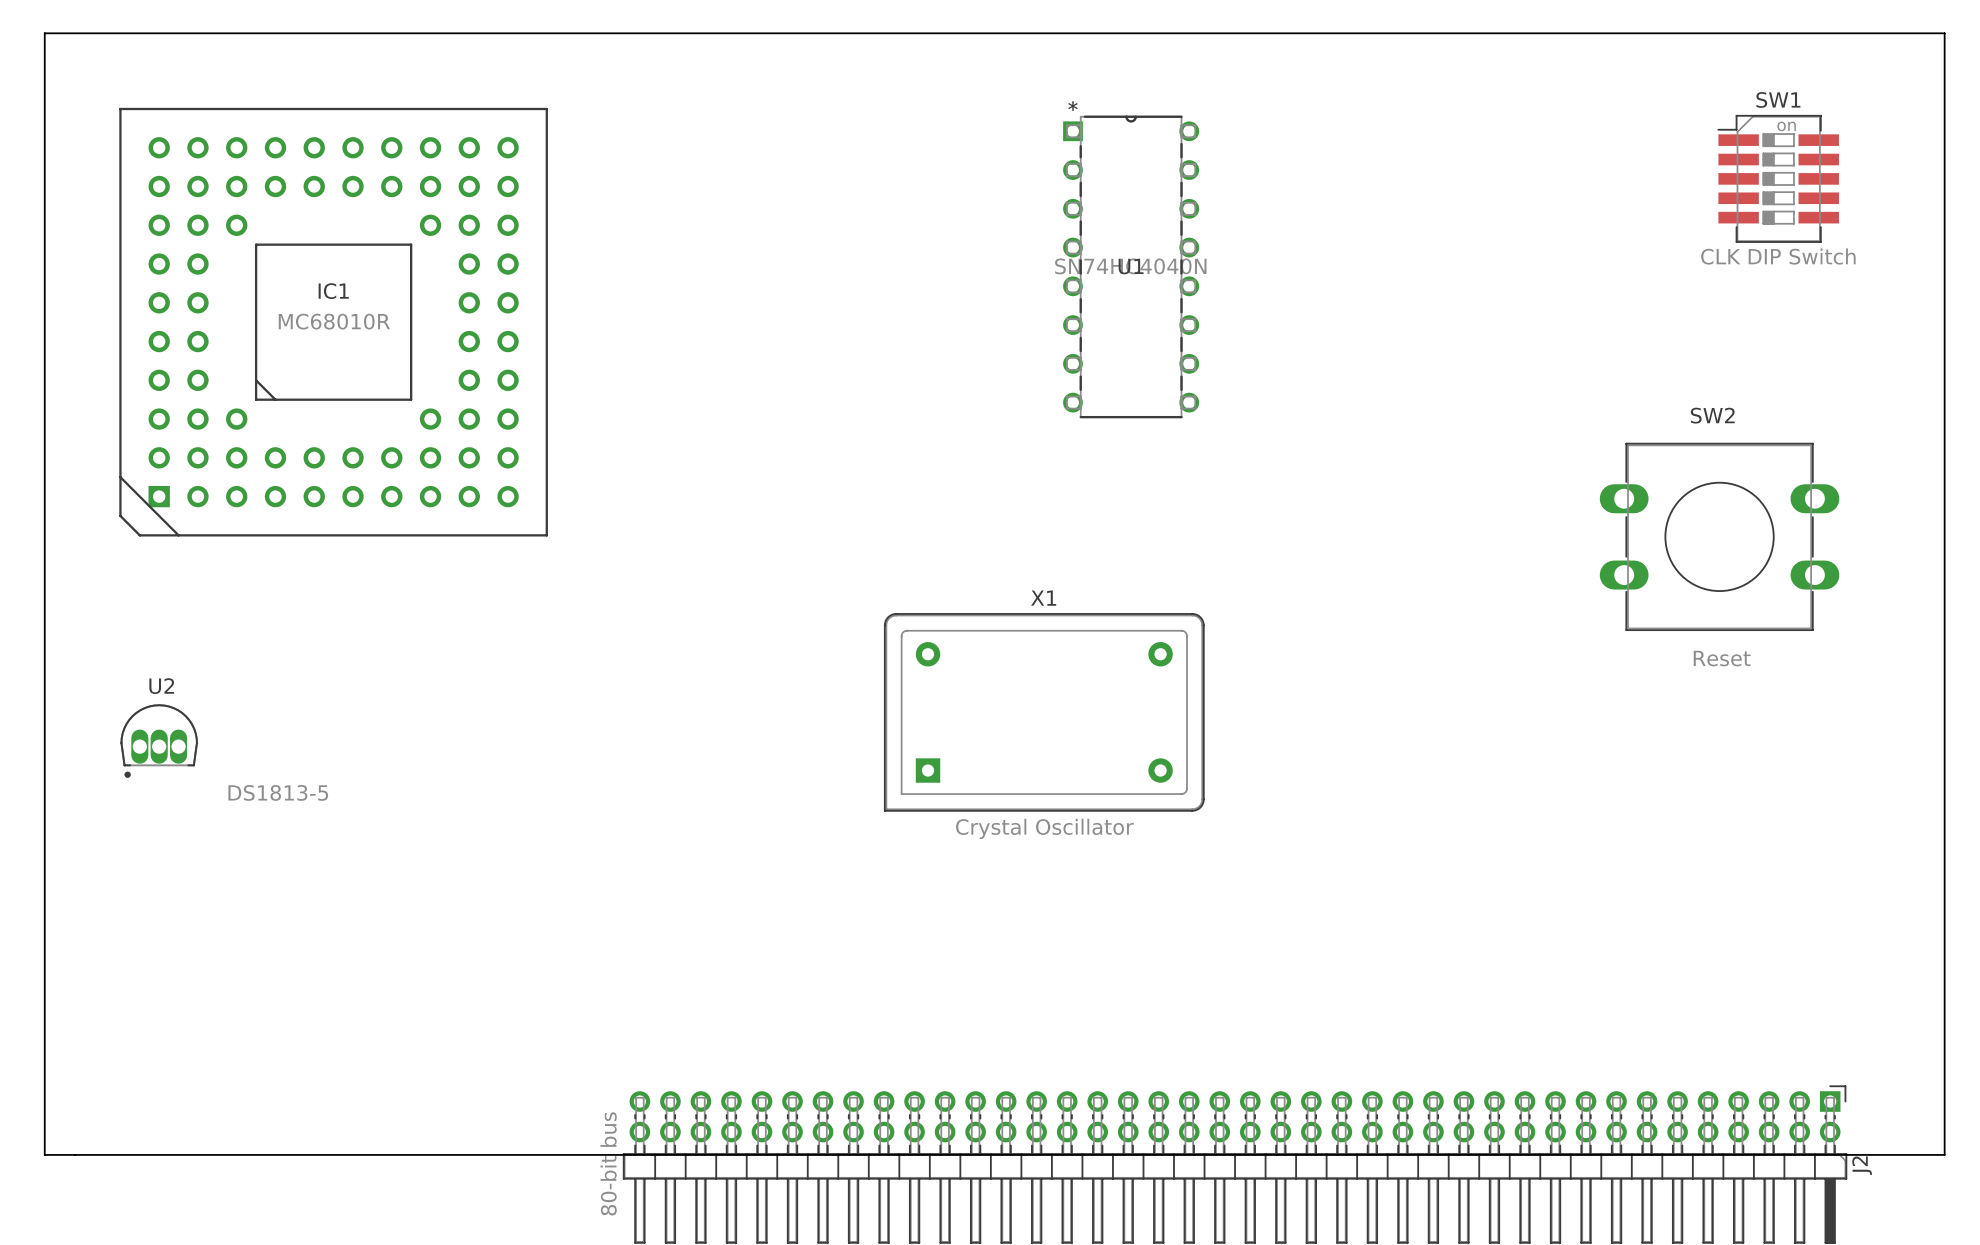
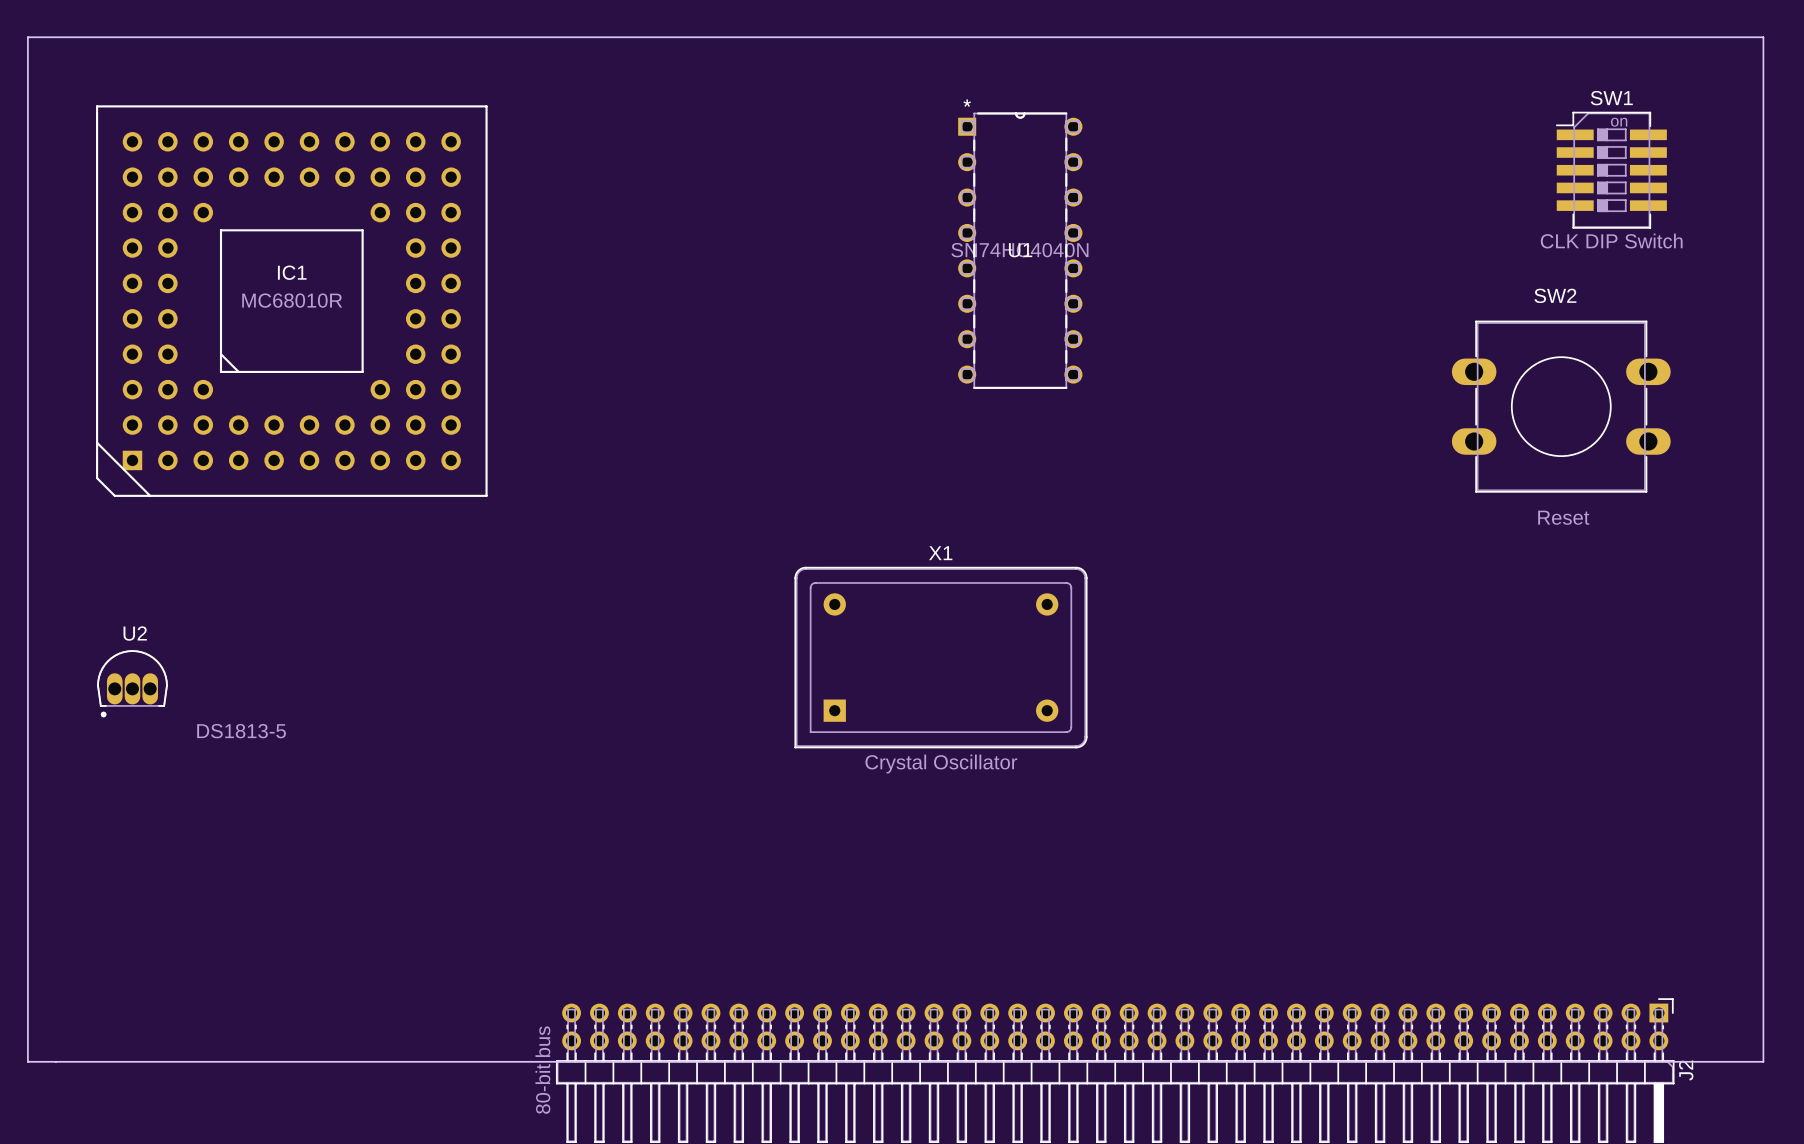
SW2 position: (1719, 536) -> (1561, 406)

